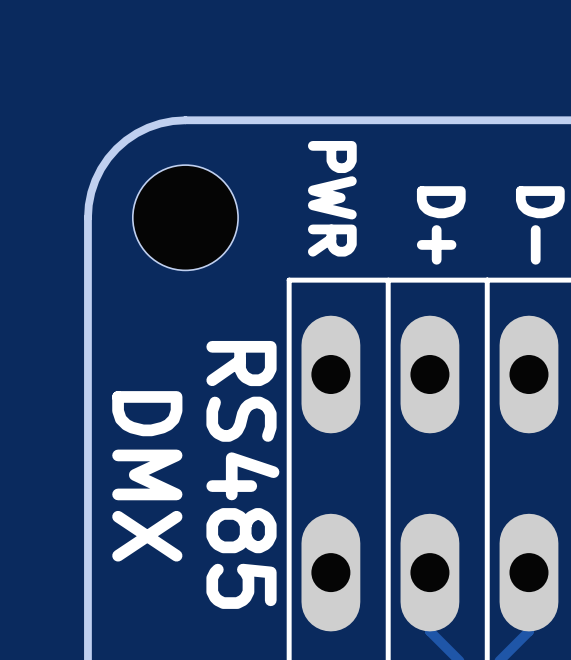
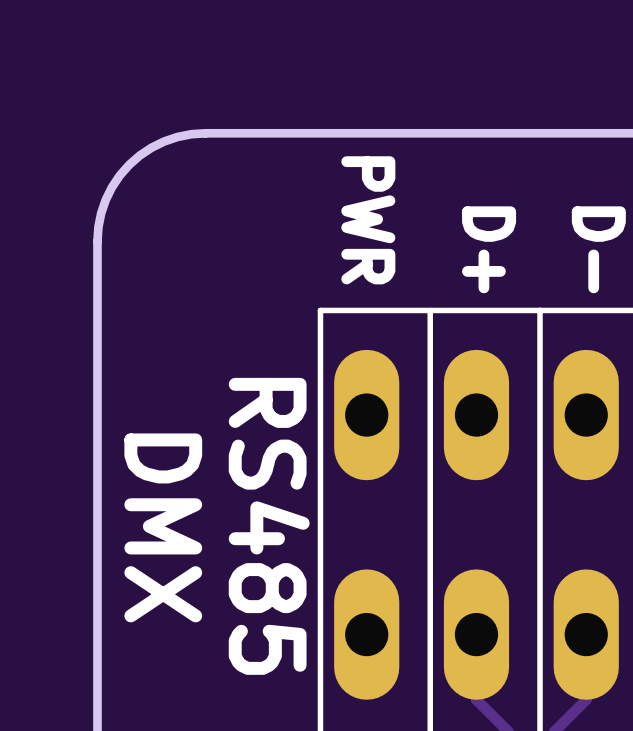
part: (185, 217) -> none

